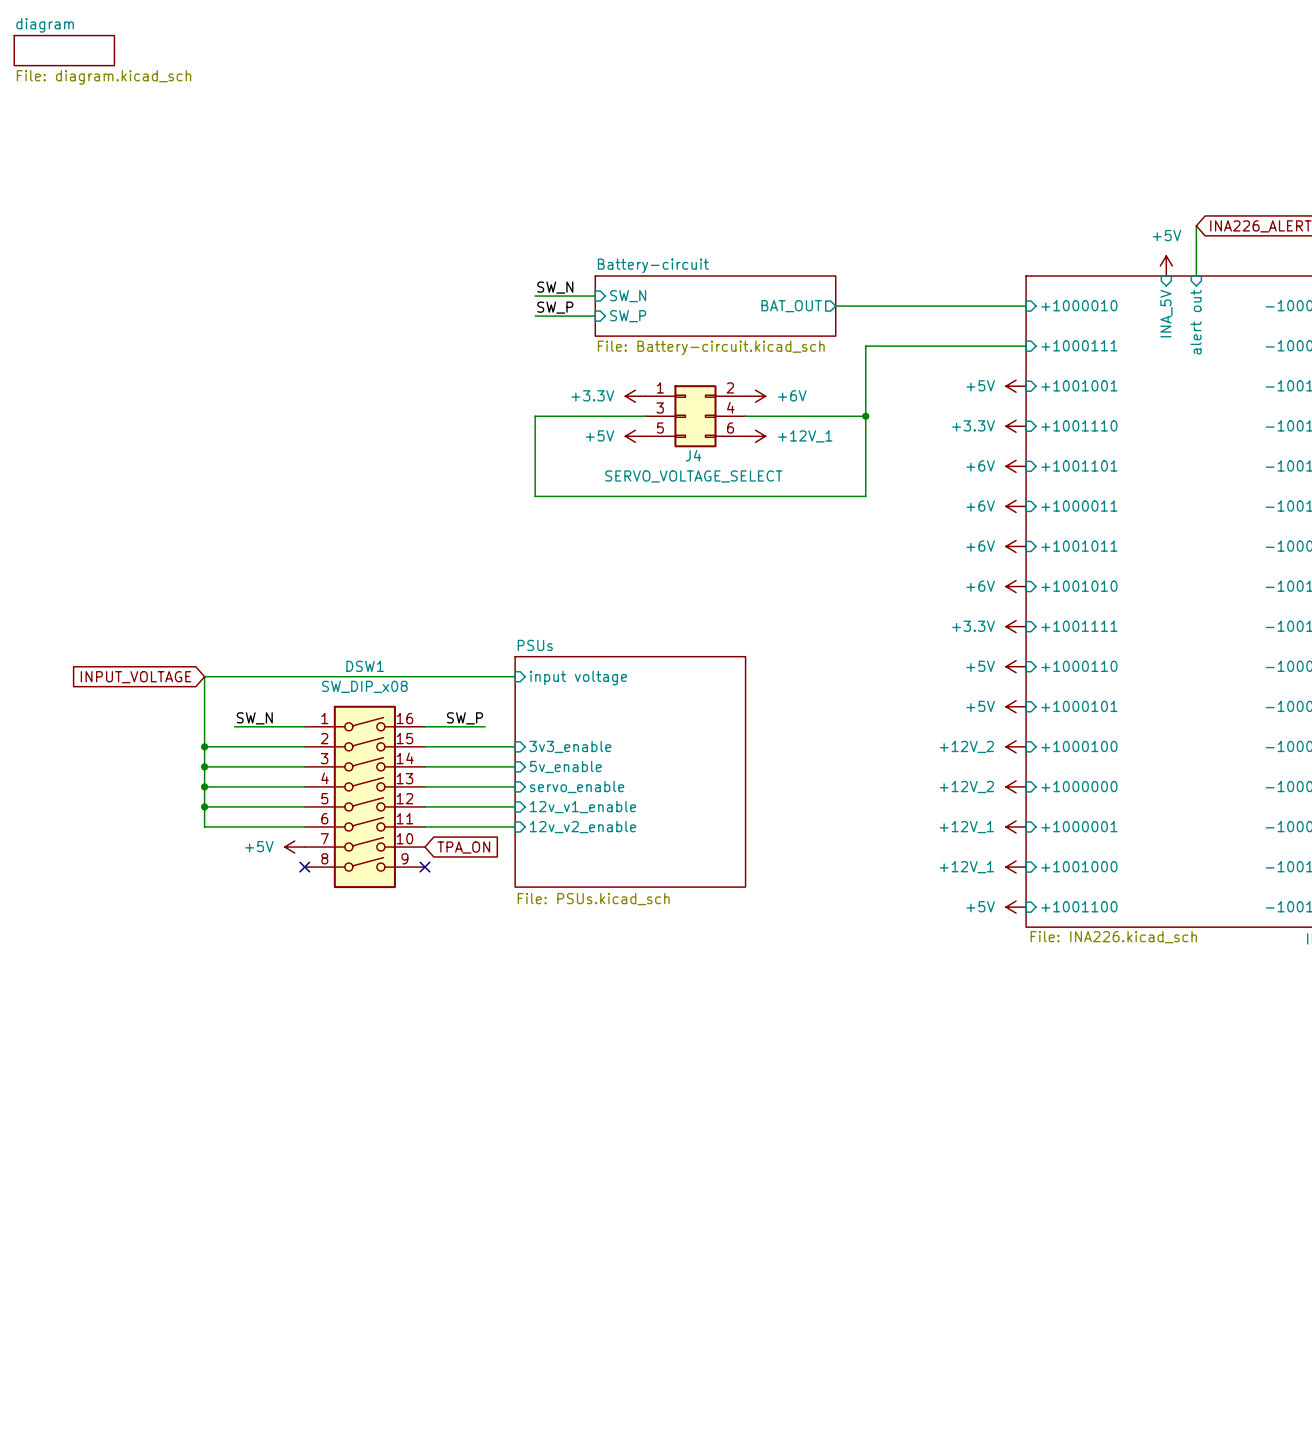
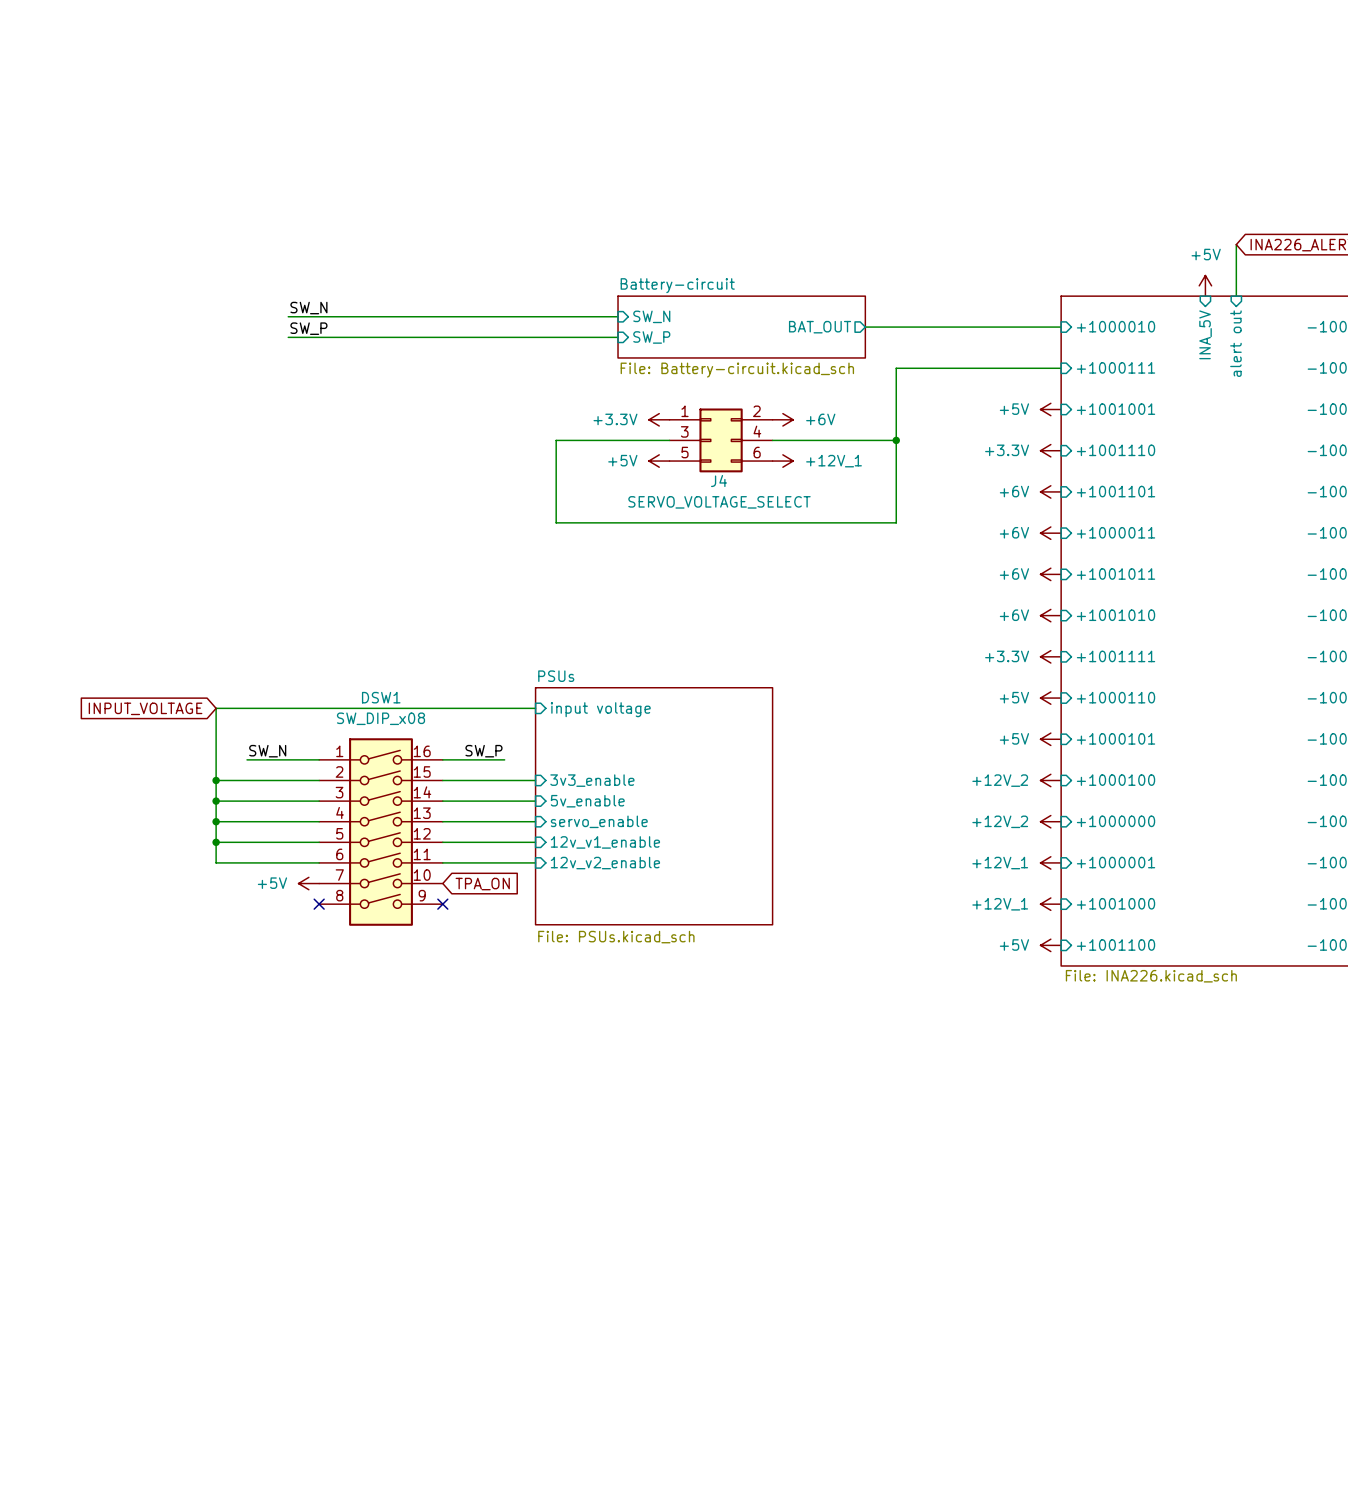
sheet diagram: File: diagram.kicad_sch (64, 50) -> none
label: none -> SW_N (308, 308)
label: SW_N (555, 287) -> none
wire: none -> (288, 316) (556, 316)
label: none -> SW_P (308, 328)
label: SW_P (555, 307) -> none
wire: none -> (288, 337) (556, 337)

